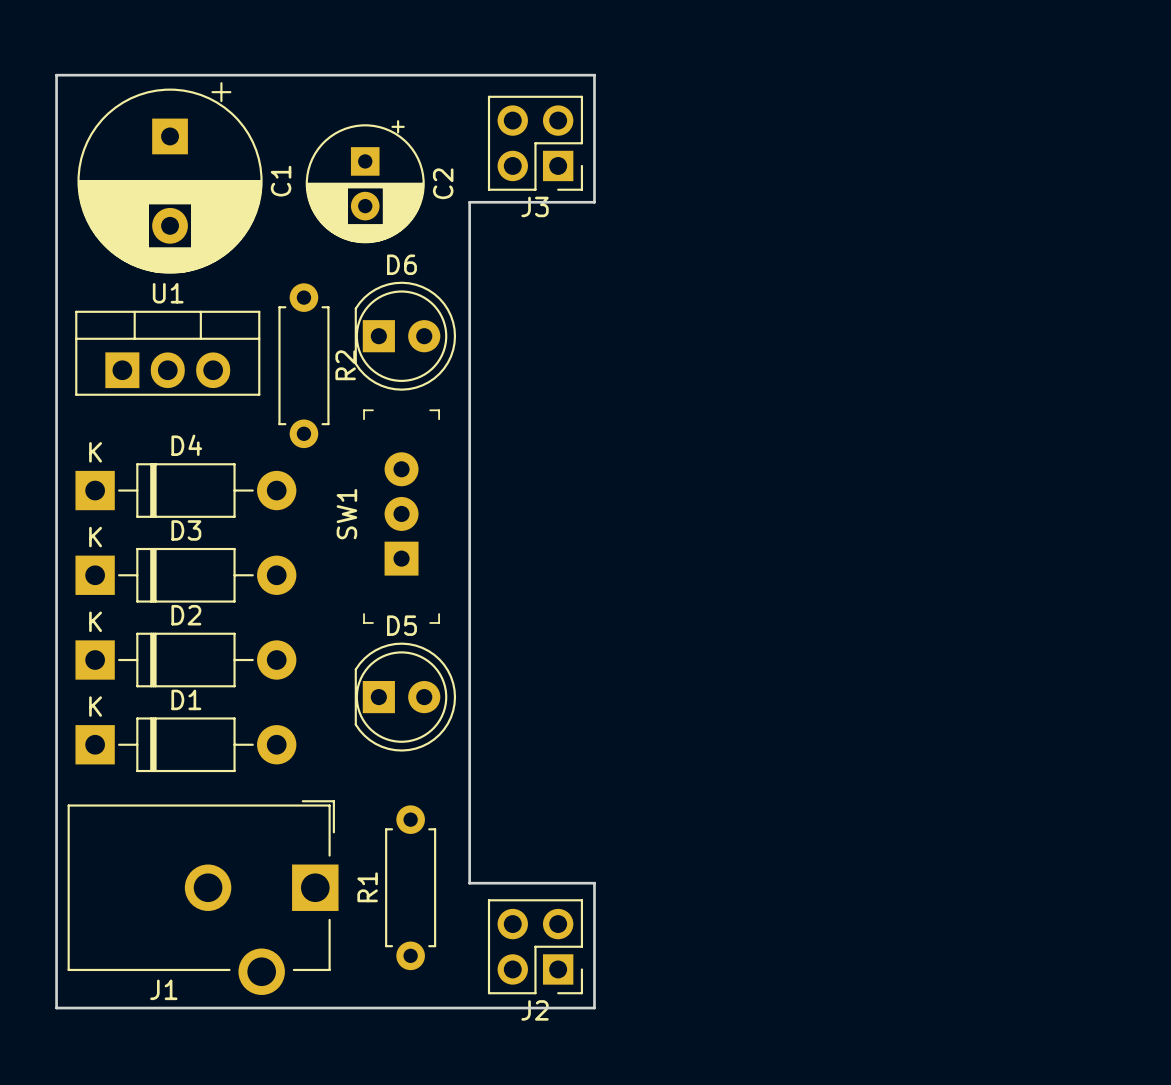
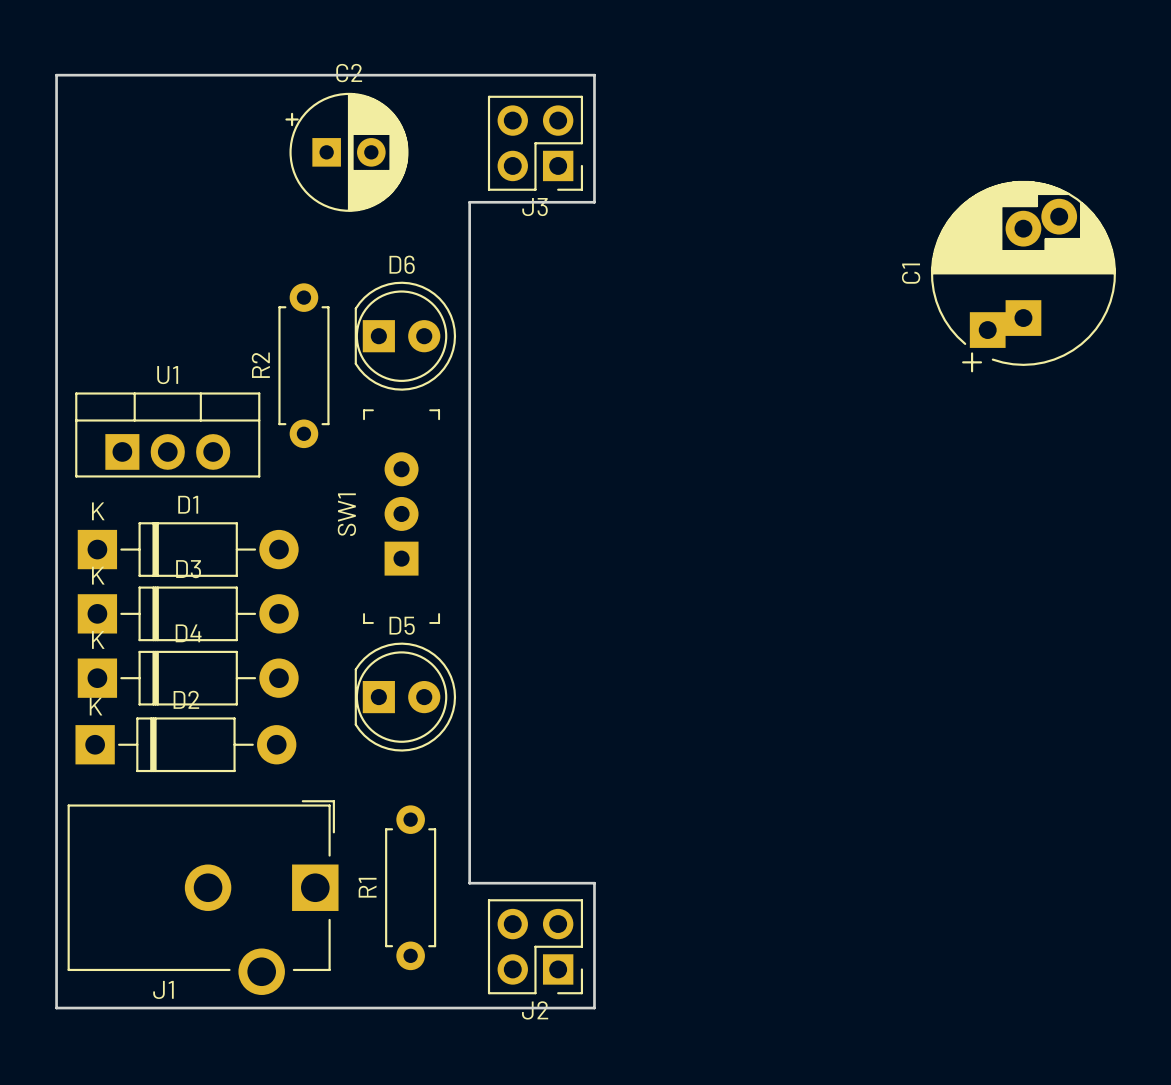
C1 footprint: [77, 82, 263, 274] -> [930, 180, 1117, 373]
C1 name position: C1 (281, 181) -> C1 (911, 273)
C2 rotation: 0° (365, 181) -> 90° counterclockwise (346, 152)
U1 position: (167, 353) -> (167, 434)
R2 name position: R2 (345, 365) -> R2 (260, 365)
D4 position: (185, 490) -> (188, 678)
D1: none -> (188, 549)
D3 position: (185, 575) -> (188, 613)
D2: (185, 660) -> none
D1 name: D1 (186, 699) -> D2 (186, 699)

